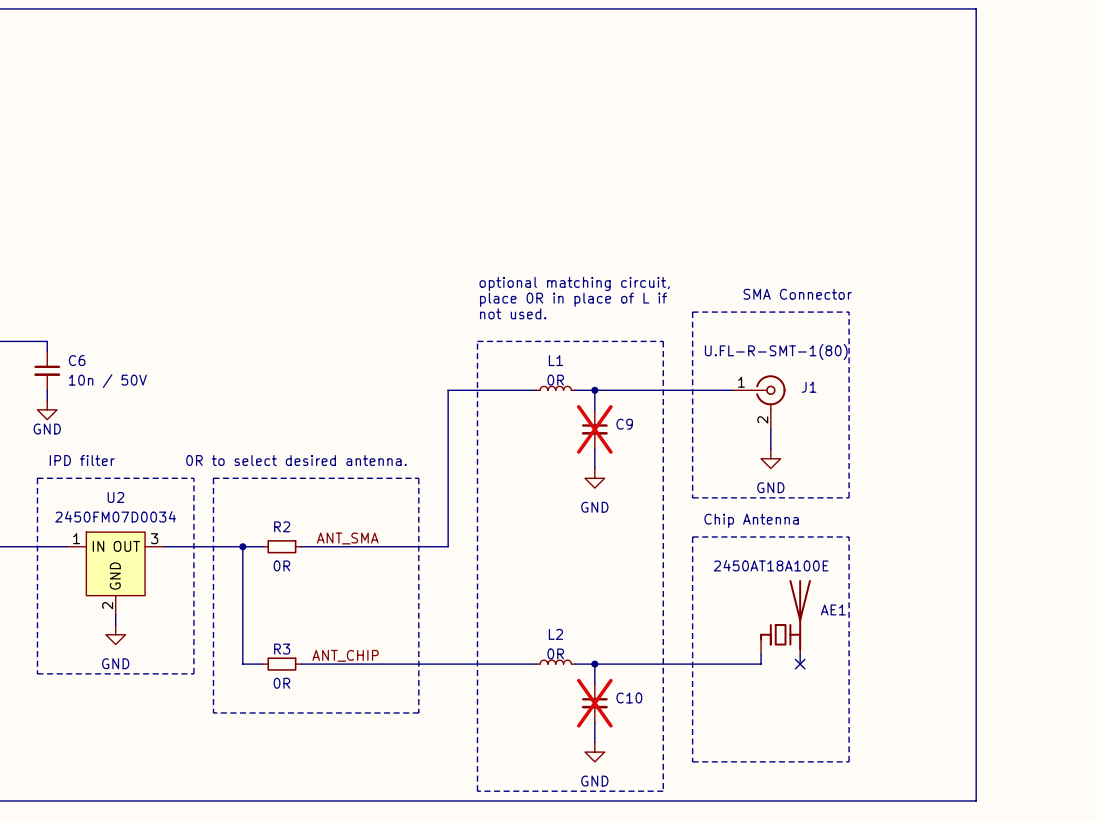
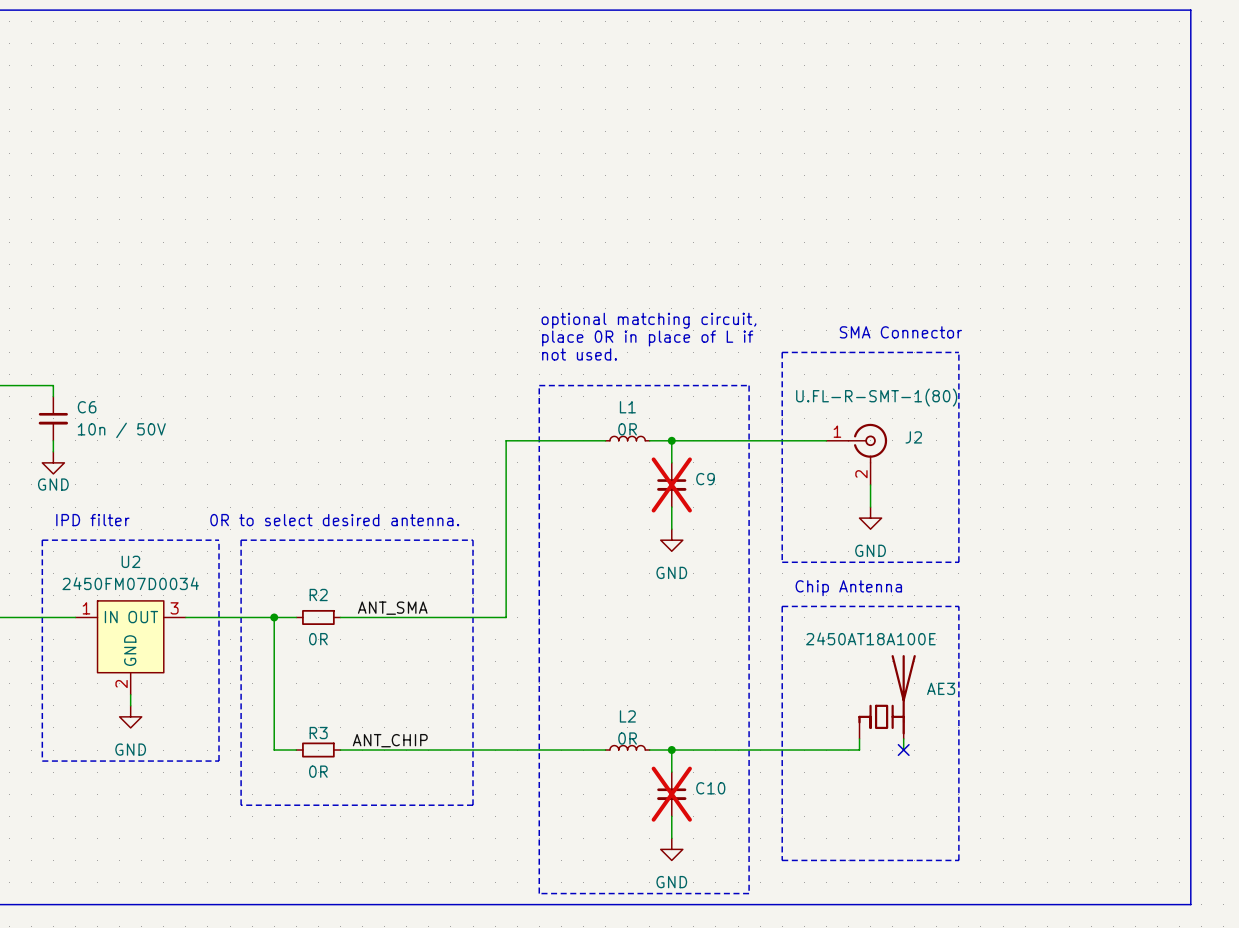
line: (976, 8) (976, 800) -> (1102, 10) (1190, 10) (1190, 904) (1102, 904)
J1 name: J1 (809, 387) -> J2 (913, 437)
AE1 name: AE1 (833, 609) -> AE3 (941, 688)

